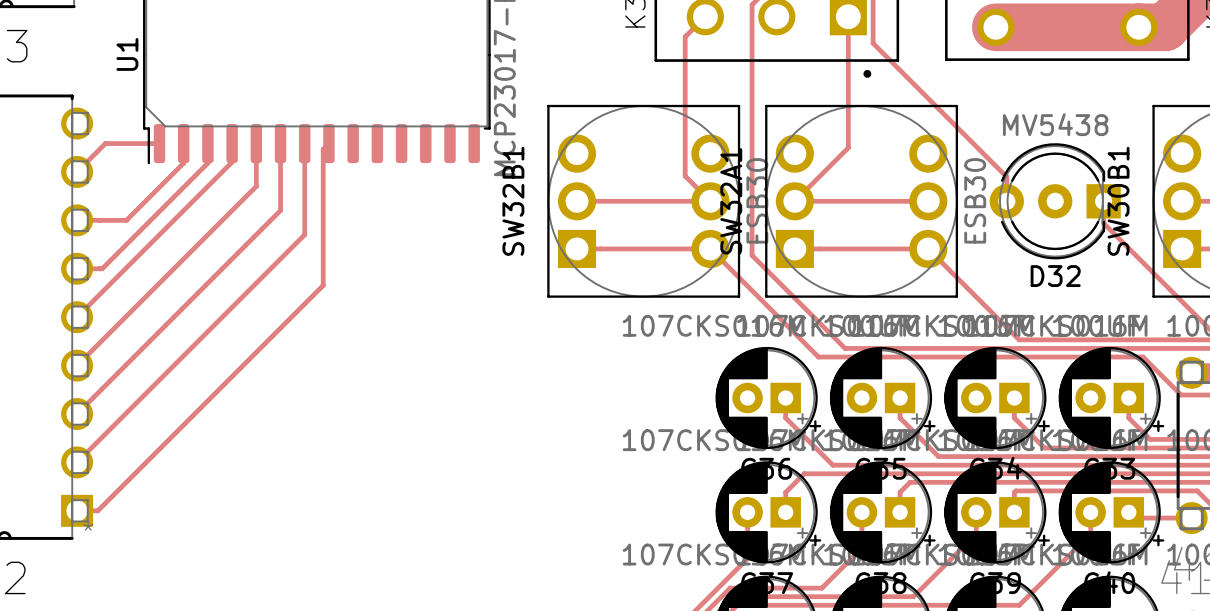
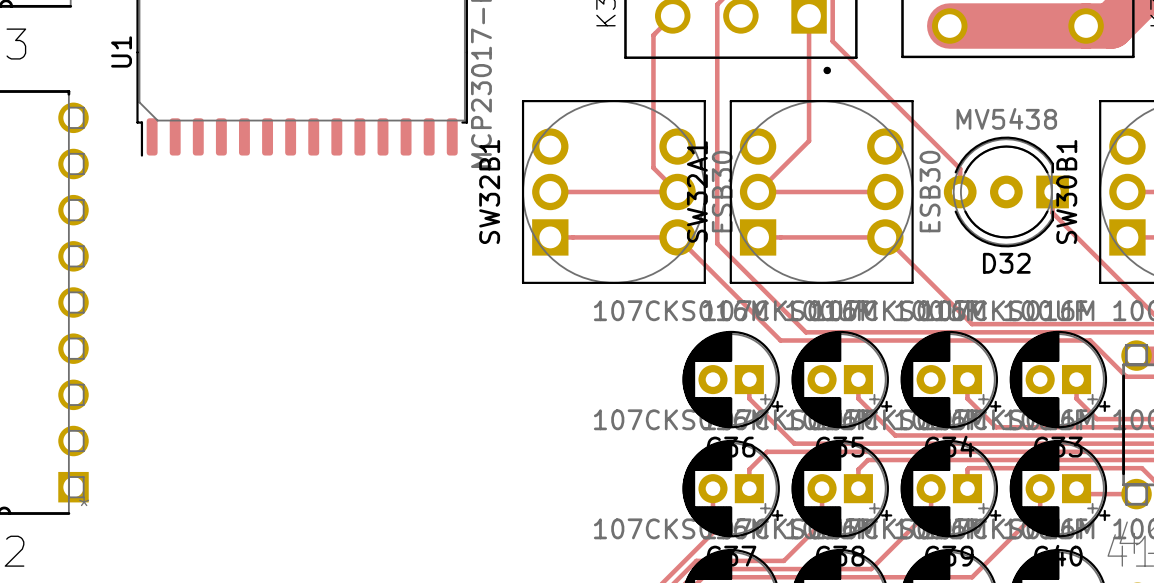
track: (159, 143) (105, 143) (77, 171) -> none
track: (183, 143) (183, 163) (126, 220) (77, 220) -> none
track: (207, 143) (207, 163) (102, 268) (77, 268) -> none
track: (232, 143) (232, 162) (77, 317) -> none
track: (256, 143) (256, 186) (77, 365) -> none
track: (280, 143) (280, 210) (77, 414) -> none
track: (304, 143) (304, 234) (77, 462) -> none
track: (328, 143) (323, 149) (323, 285) (97, 510) (77, 510) -> none

